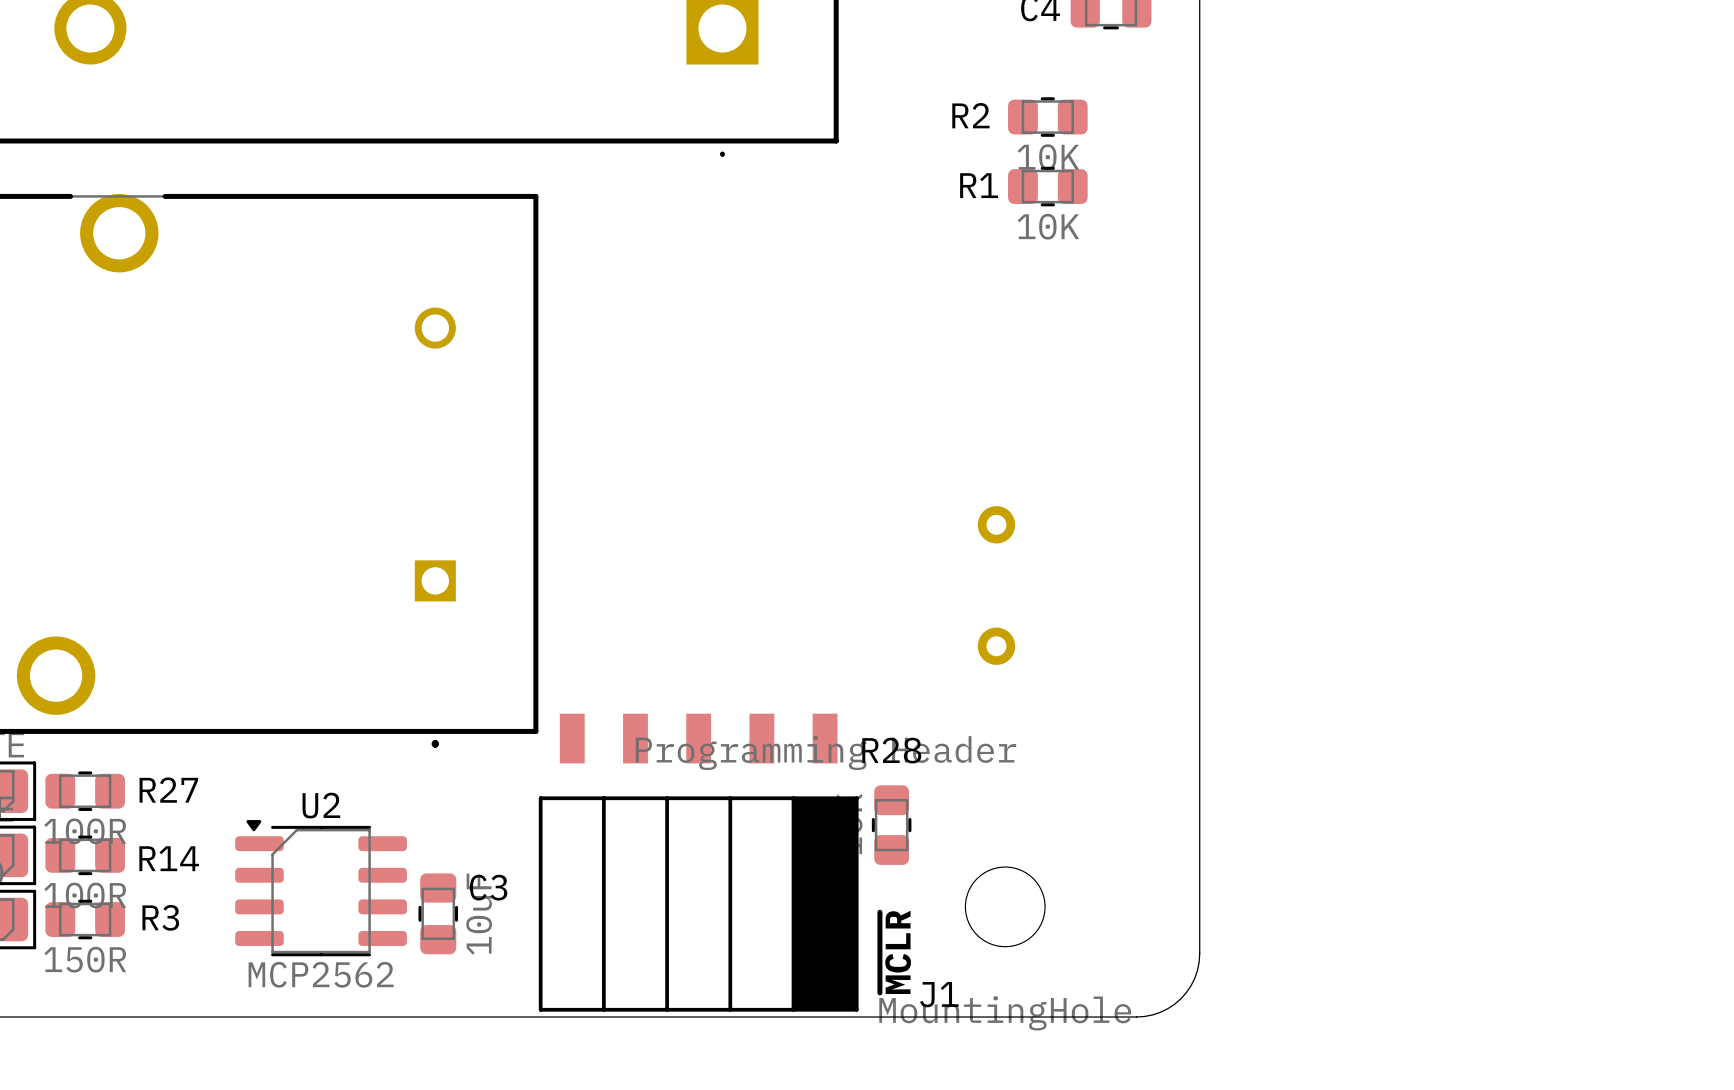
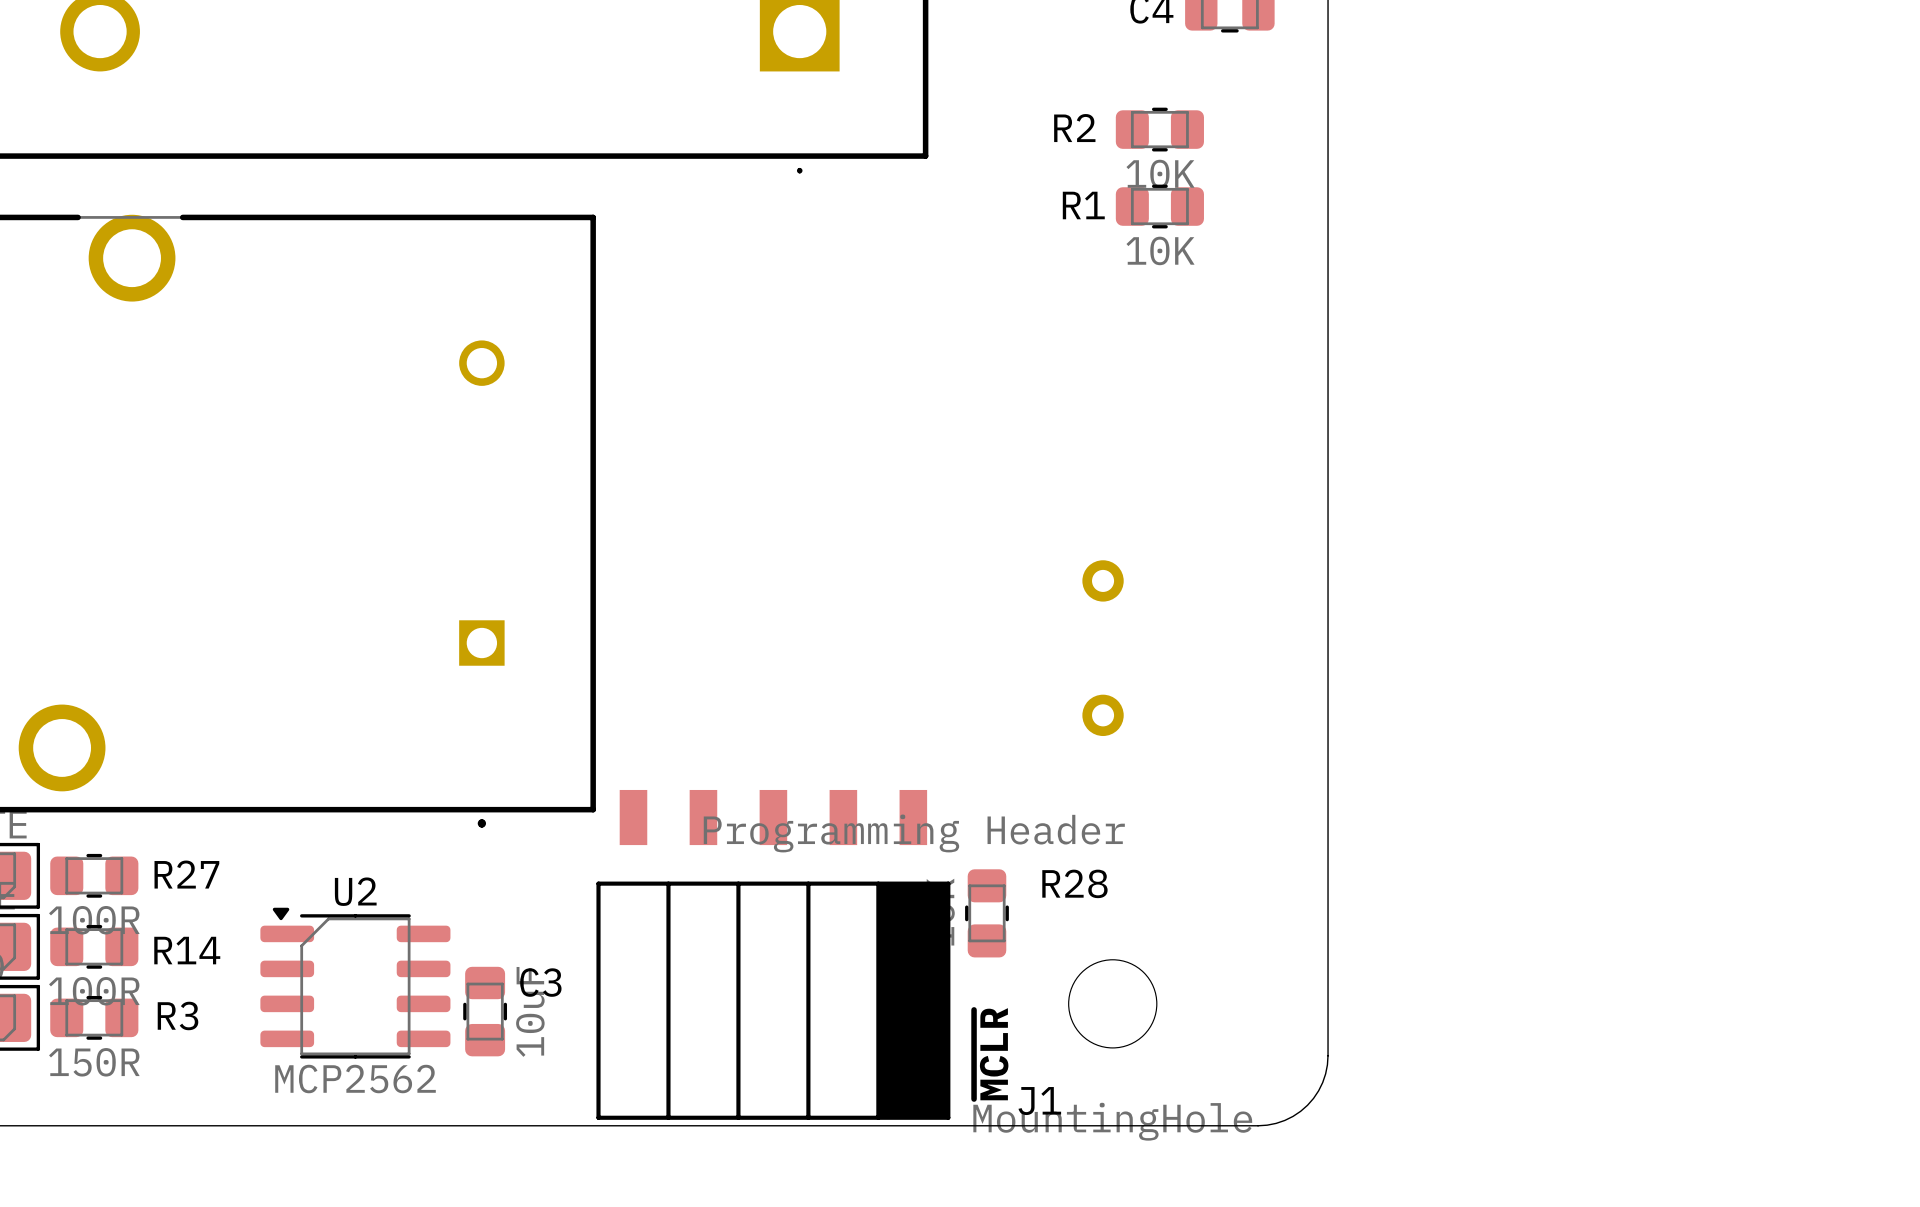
R28 name position: R28 (891, 750) -> R28 (1074, 883)

